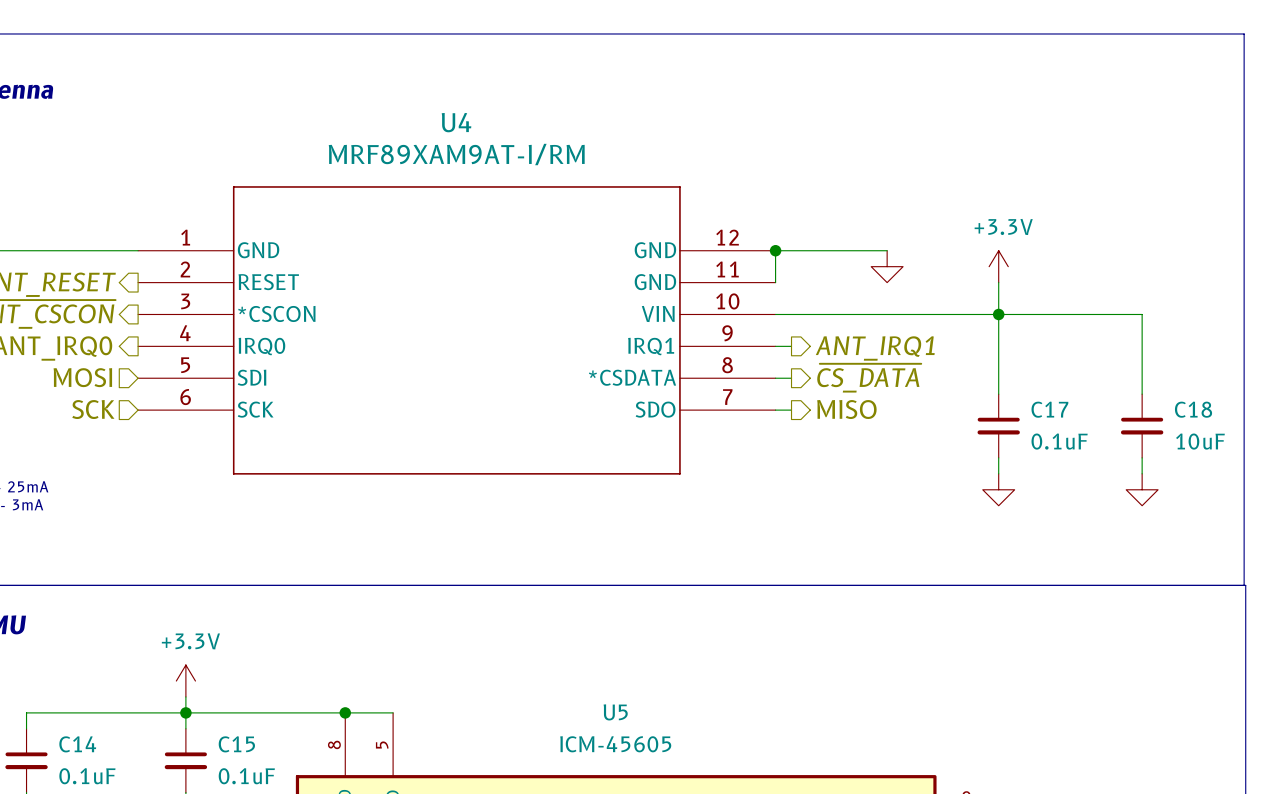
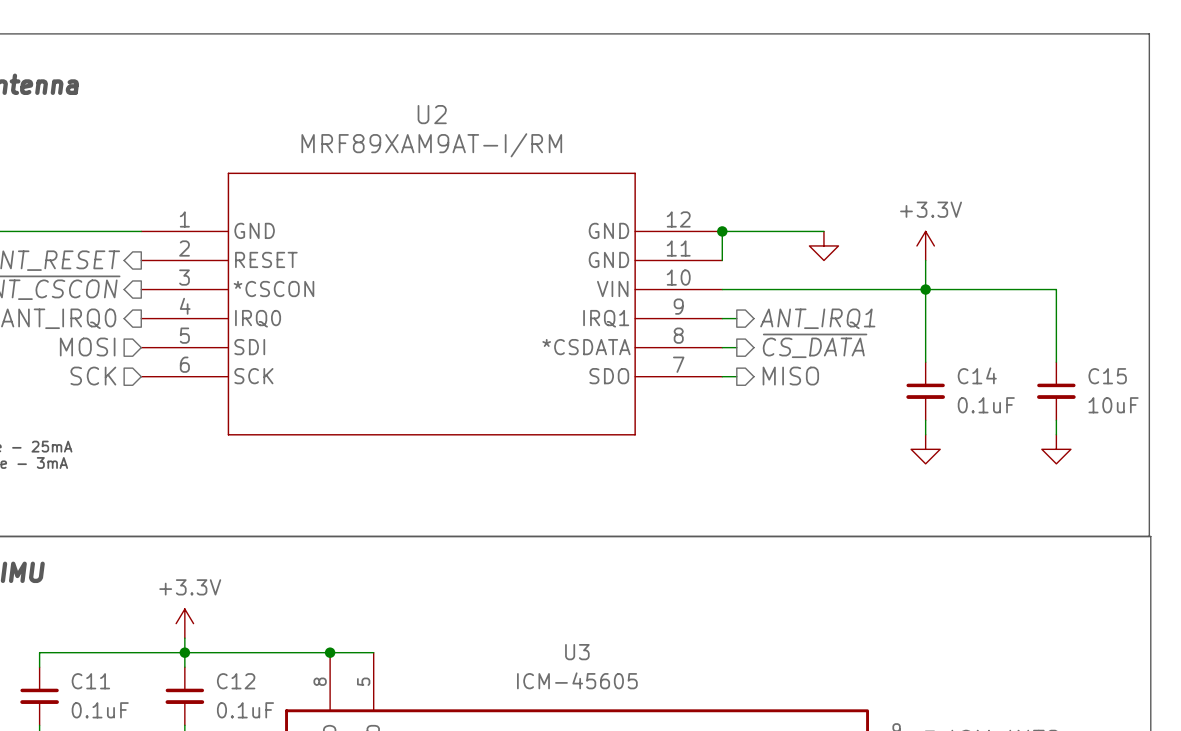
U4 name: U4 (456, 122) -> U2 (432, 114)
C17 name: C17 (1049, 409) -> C14 (977, 375)
C18 name: C18 (1193, 409) -> C15 (1107, 376)
U5 name: U5 (615, 712) -> U3 (577, 652)
C14 name: C14 (77, 744) -> C11 (90, 681)
C15 name: C15 (236, 744) -> C12 (236, 681)

